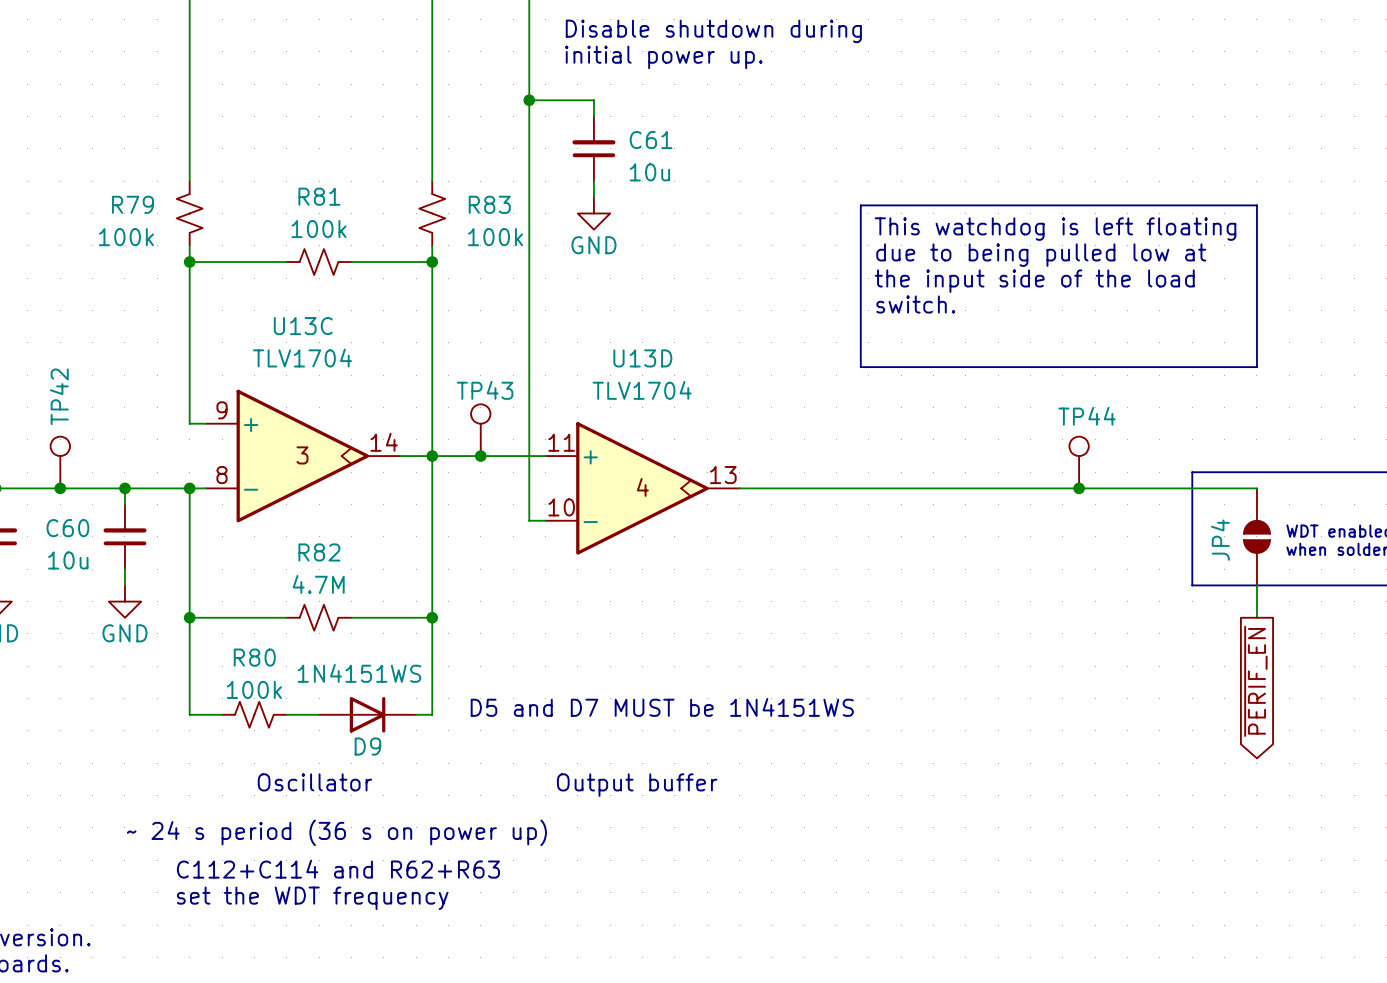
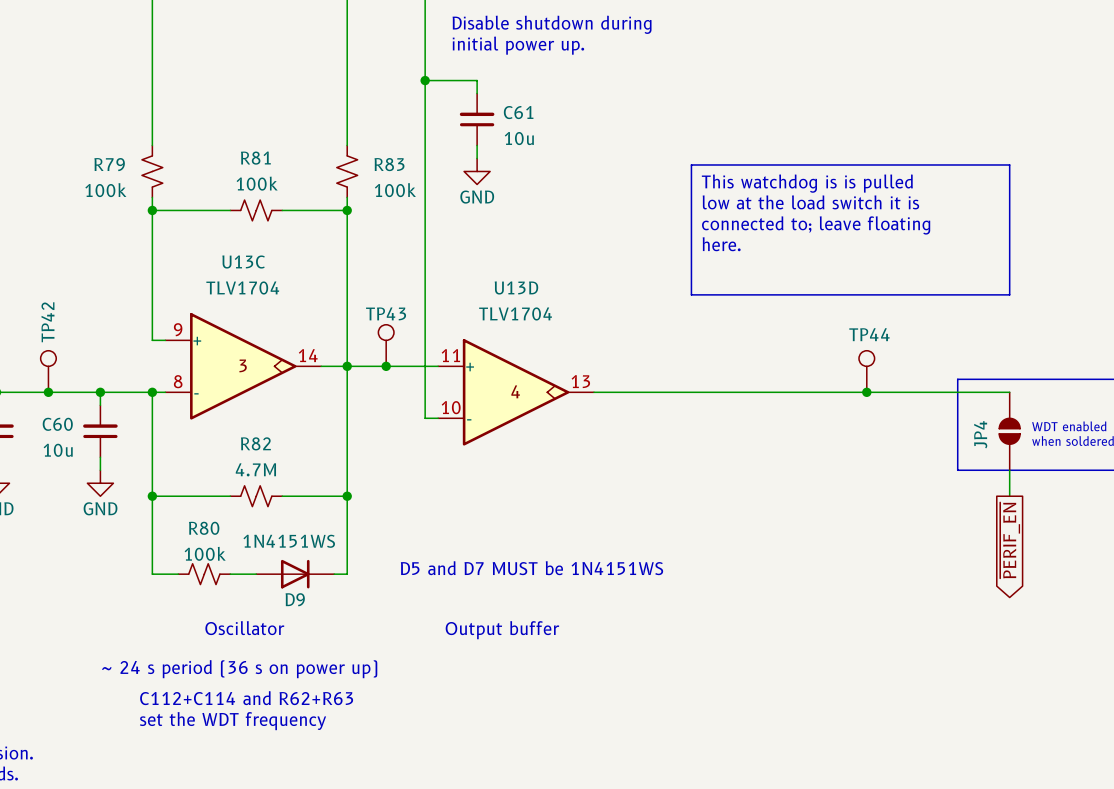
text: This watchdog is left floating (1055, 229) -> This watchdog is is pulled (807, 183)
text: due to being pulled low at (1041, 255) -> low at the load switch it is (810, 202)
text: the input side of the load (1034, 281) -> connected to; leave floating (816, 225)
text: switch. (915, 304) -> here. (721, 244)

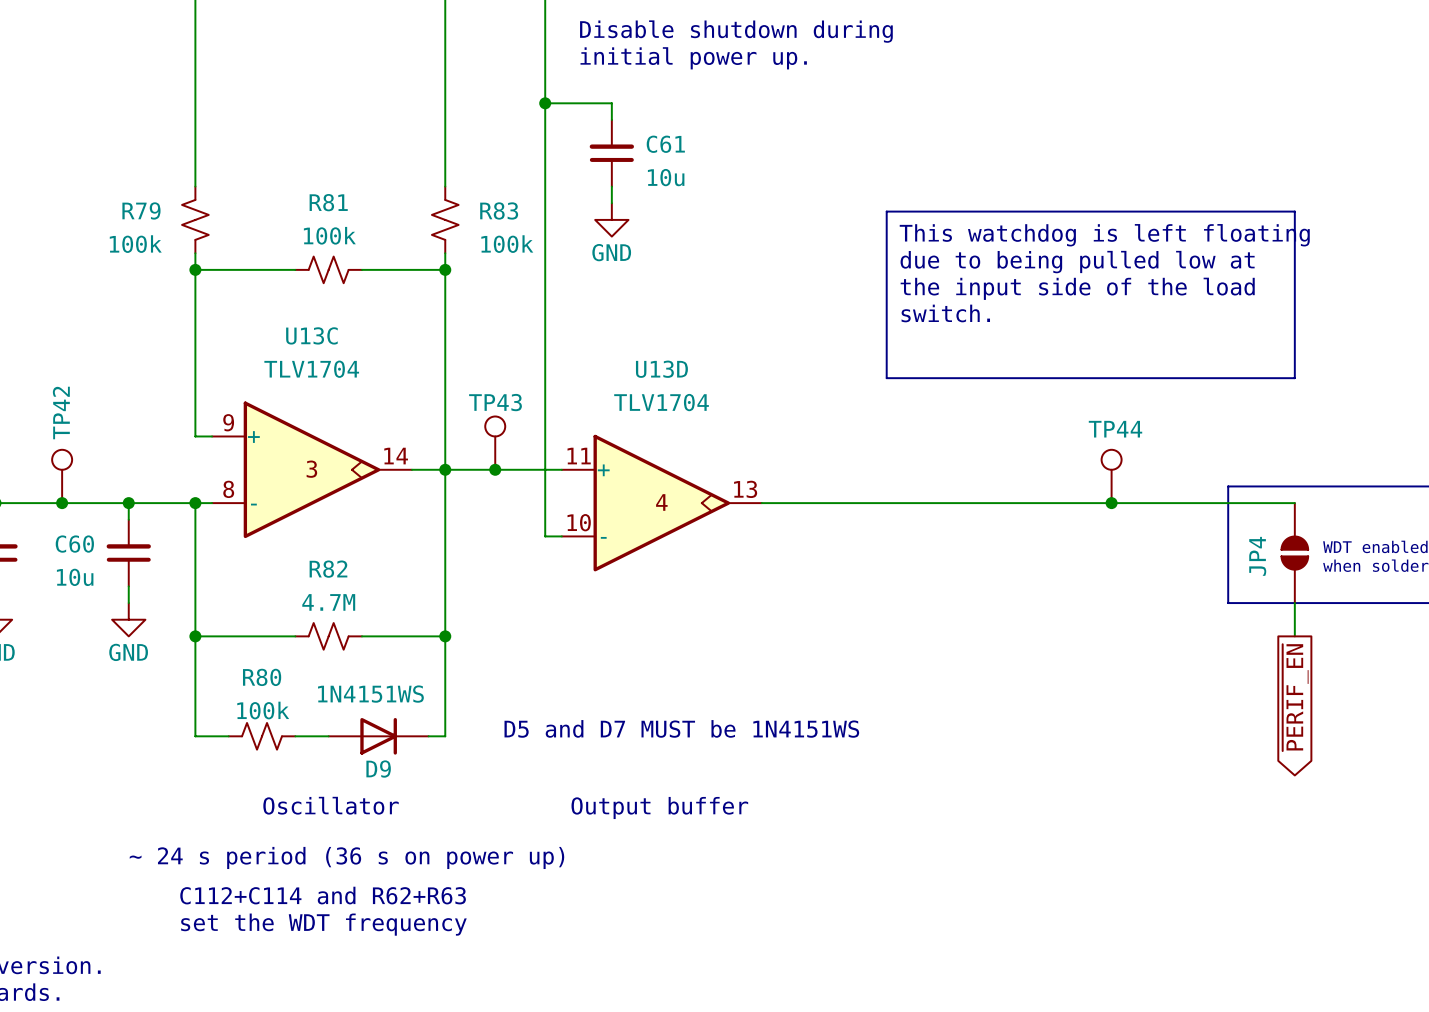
text: This watchdog is is pulled (807, 183) -> This watchdog is left floating (1104, 235)
text: low at the load switch it is (810, 202) -> due to being pulled low at (1077, 262)
text: connected to; leave floating (816, 225) -> the input side of the load (1077, 288)
text: here. (721, 244) -> switch. (945, 313)

